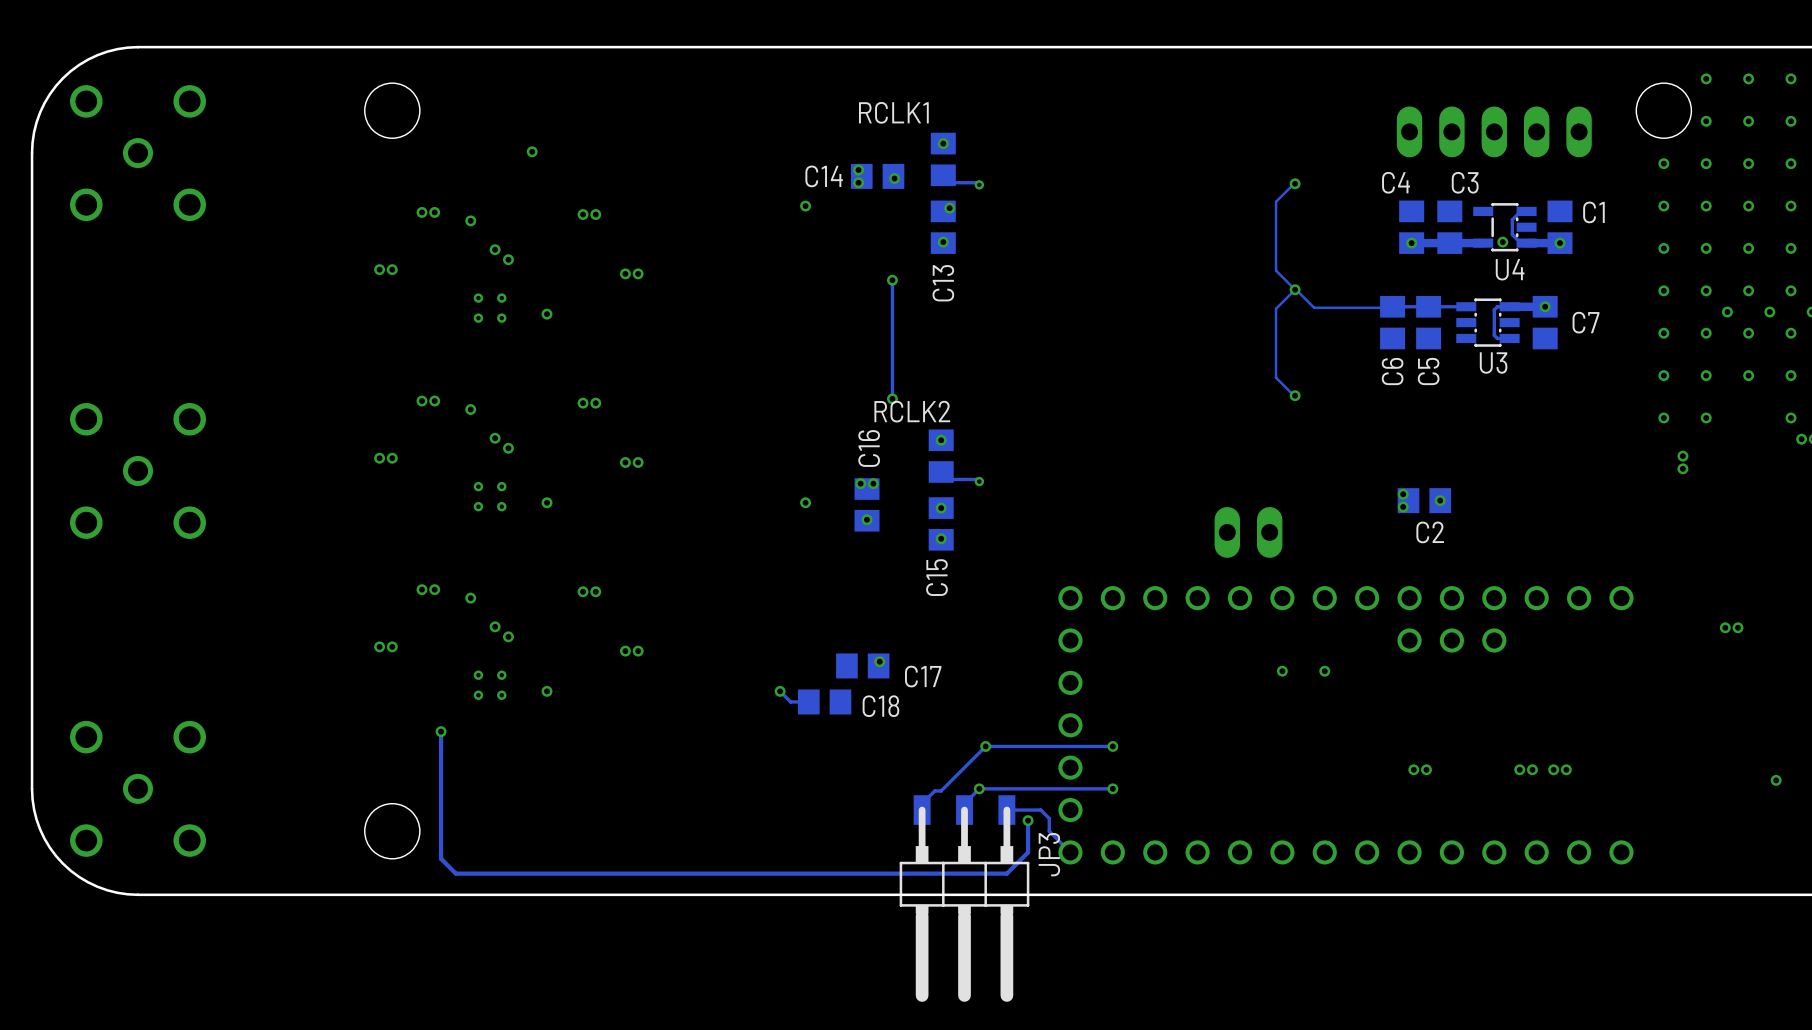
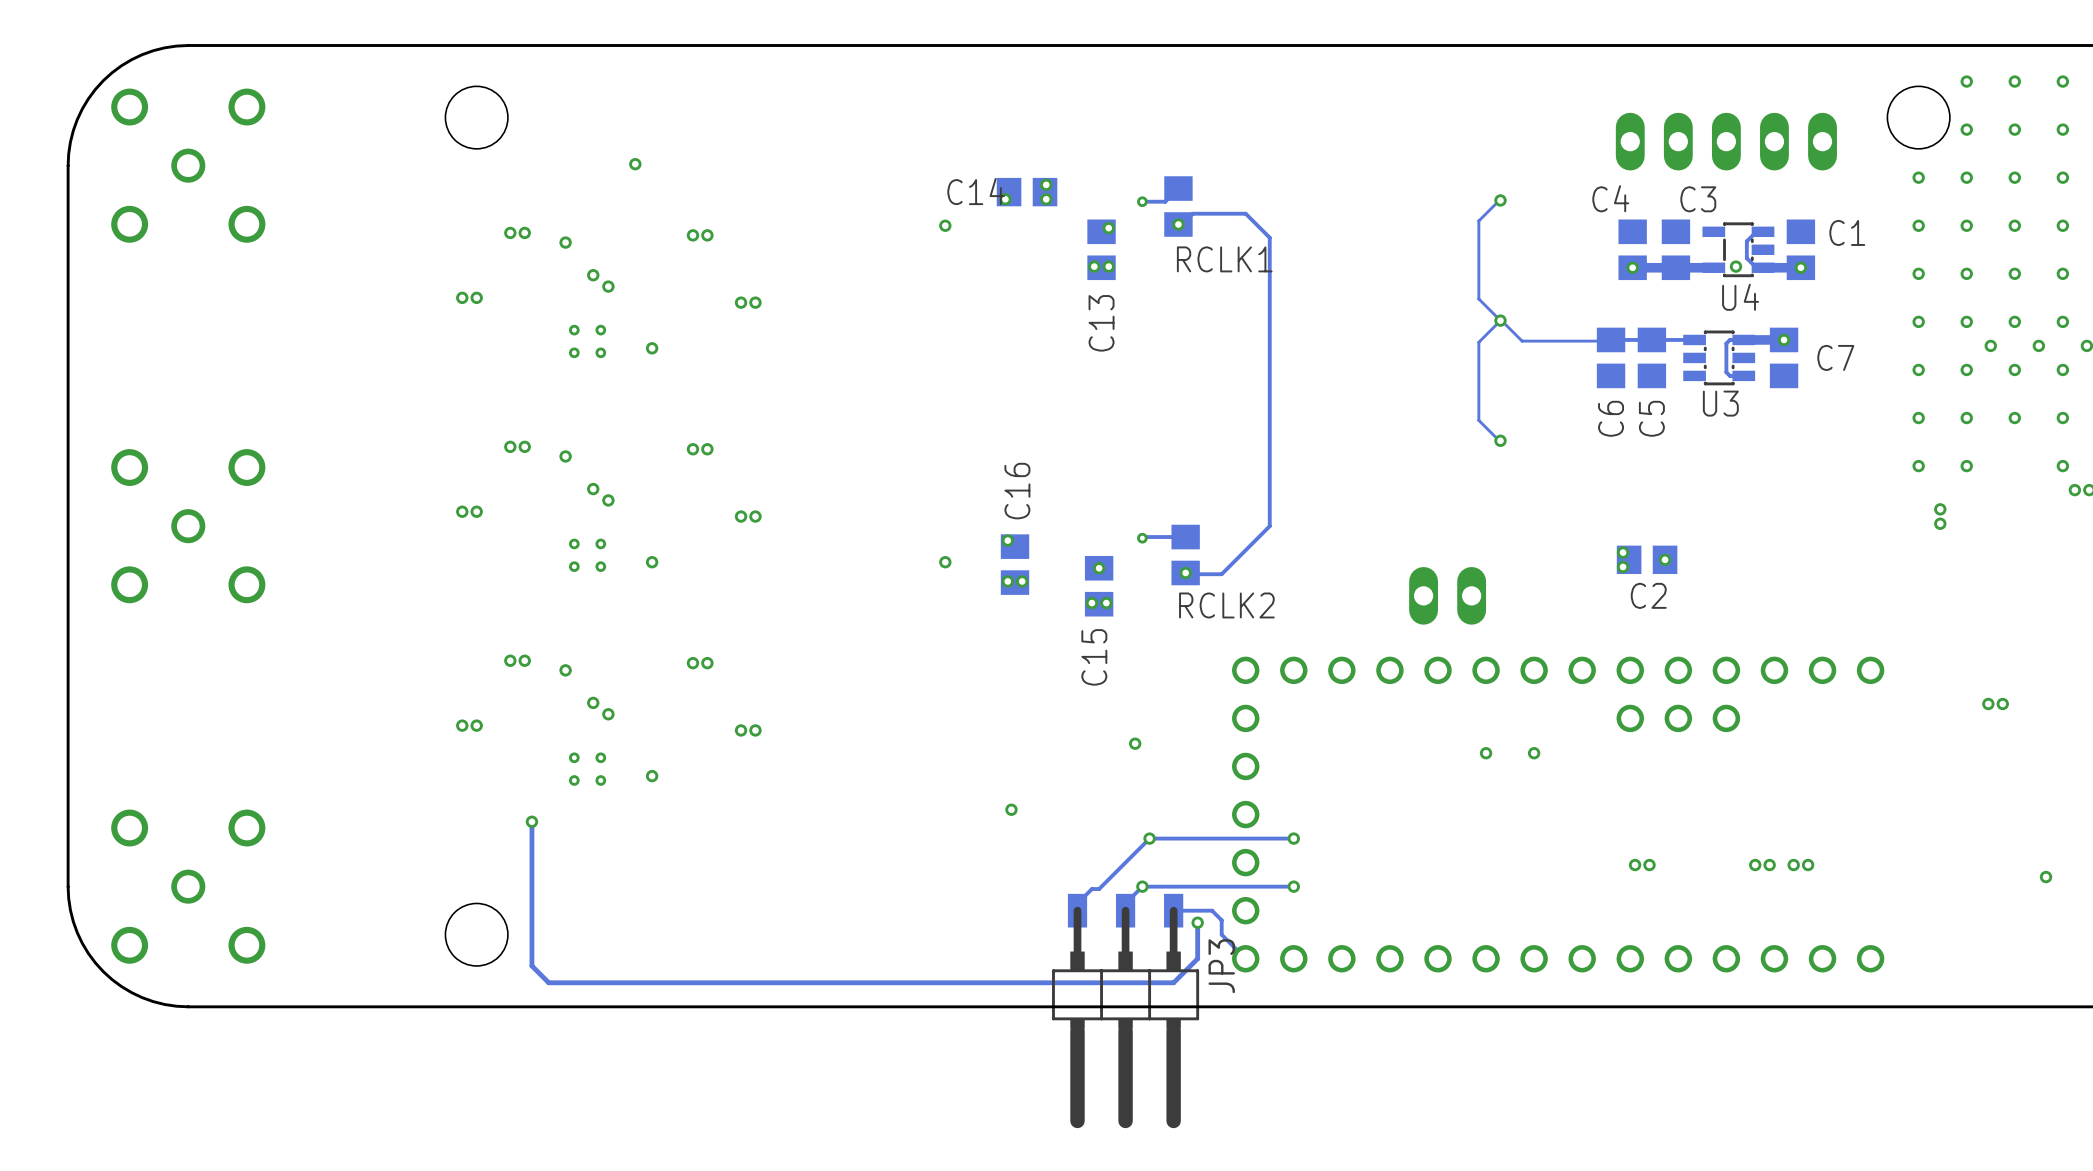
RCLK1 name position: RCLK1 (893, 112) -> RCLK1 (1224, 259)
via: (943, 143) -> none
RCLK1 position: (943, 159) -> (1178, 206)
via: (858, 170) -> none
via: none -> (1046, 184)
track: none -> (1178, 188) (1165, 201) (1140, 201)
track: (943, 175) (950, 182) (977, 182) (979, 184) -> none
via: (894, 178) -> none
via: none -> (1046, 199)
track: none -> (1178, 224) (1182, 224) (1192, 213) (1245, 213) (1269, 237) (1269, 526) (1221, 574) (1185, 572)
via: none -> (1178, 224)
via: none -> (1094, 266)
via: (943, 242) -> none
via: none -> (1108, 266)
track: (892, 280) (892, 398) -> none
via: (892, 280) -> none
via: (892, 398) -> none
RCLK2 name position: RCLK2 (912, 411) -> RCLK2 (1226, 605)
via: (941, 440) -> none
RCLK2 position: (941, 456) -> (1185, 555)
track: (941, 471) (949, 479) (977, 479) (979, 481) -> none
track: none -> (1185, 537) (1140, 538)
via: (873, 483) -> none
via: none -> (1185, 572)
via: none -> (1007, 581)
via: (867, 519) -> none
via: none -> (1022, 581)
via: none -> (1091, 603)
via: (941, 538) -> none
via: none -> (1106, 603)
via: (879, 661) -> none
via: none -> (1135, 743)
C17: (862, 665) -> none
track: (780, 691) (790, 701) (808, 701) -> none
via: (780, 691) -> none
C18: (824, 701) -> none
via: none -> (1011, 809)

